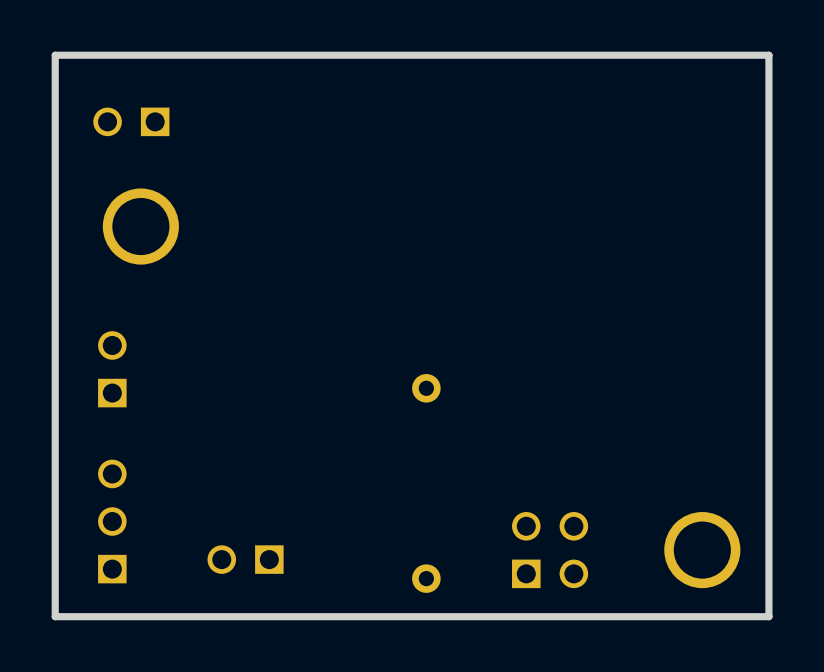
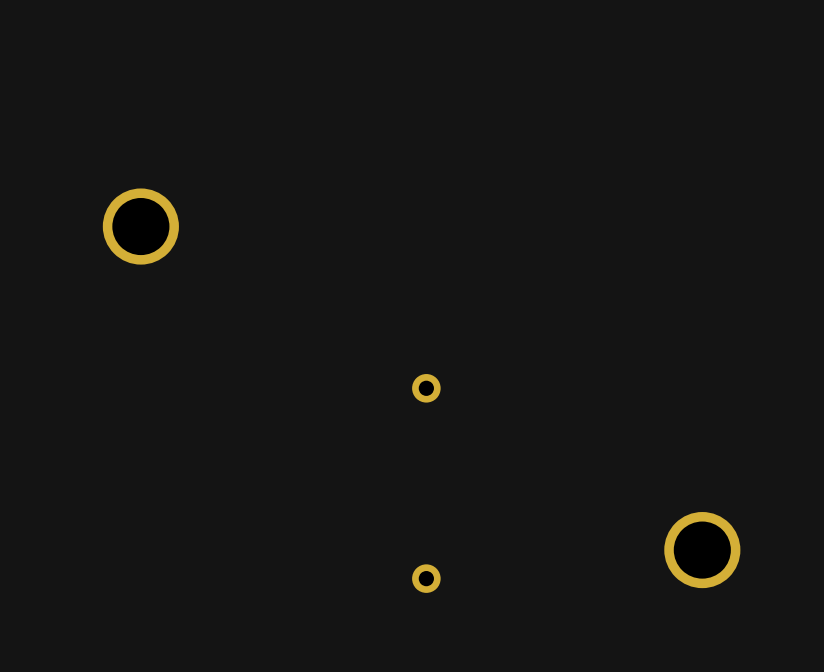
board edge: (768, 55) (768, 616) (55, 616) (55, 55) (768, 55) -> none
part: (131, 121) -> none
part: (112, 369) -> none
part: (112, 521) -> none
part: (550, 550) -> none
part: (245, 559) -> none

